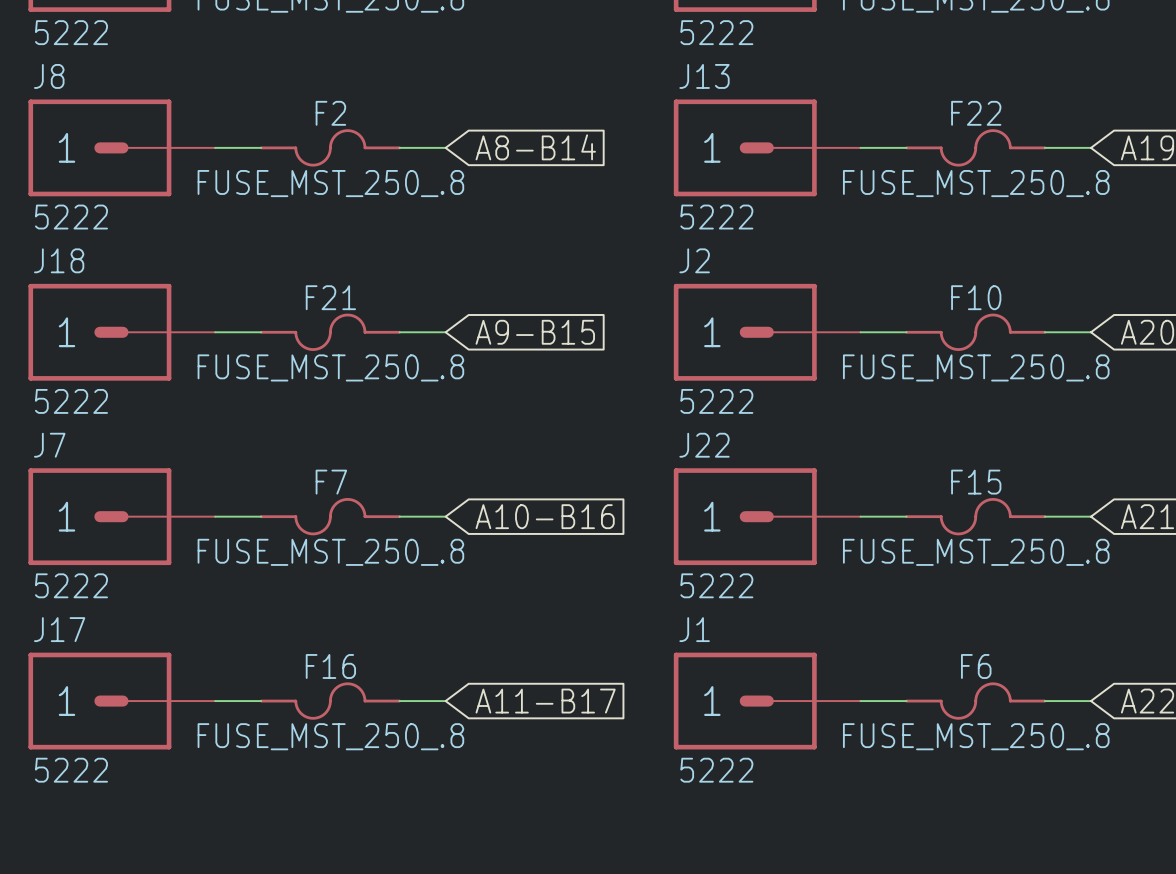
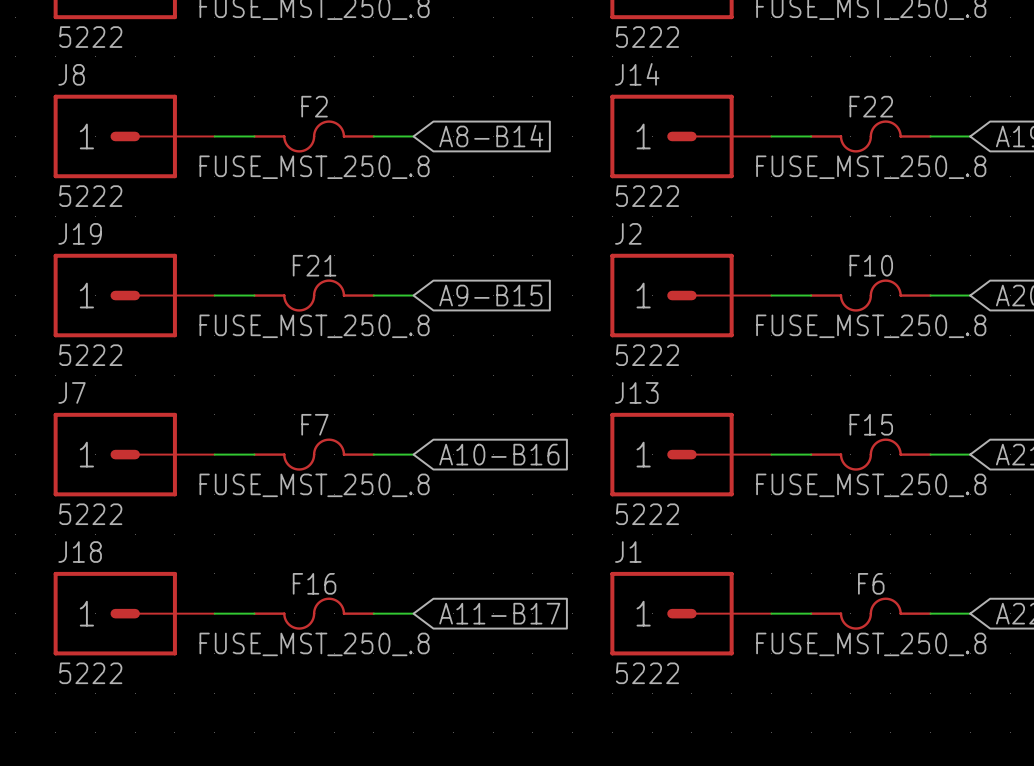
J13 name: J13 (704, 76) -> J14 (637, 74)
J18 name: J18 (59, 260) -> J19 (80, 233)
J22 name: J22 (704, 445) -> J13 (636, 392)
J17 name: J17 (59, 629) -> J18 (80, 552)

